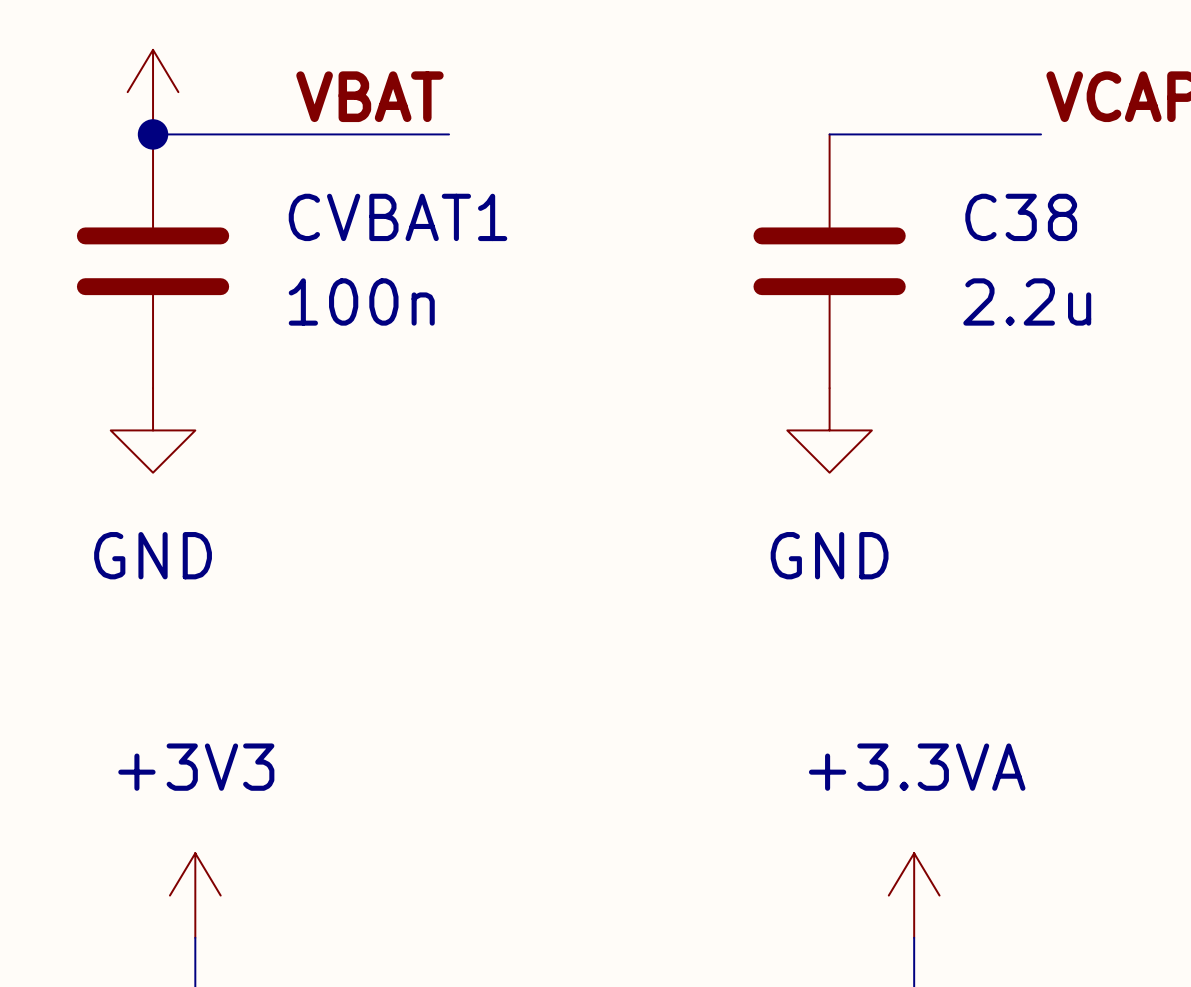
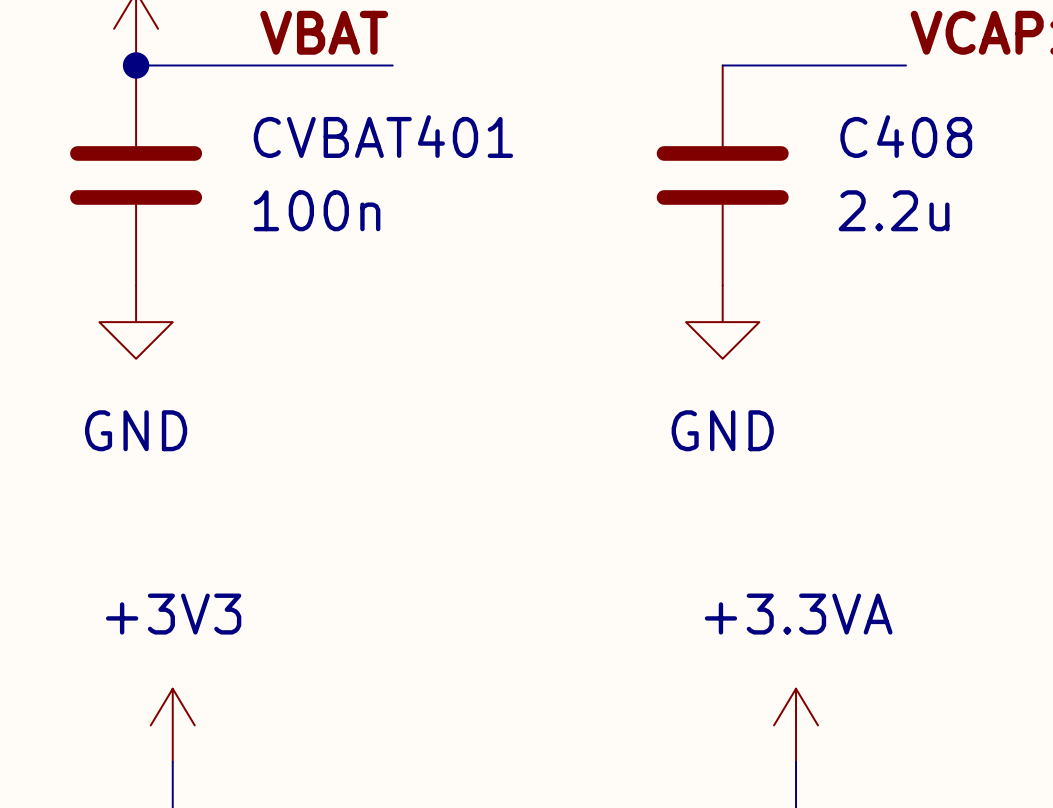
CVBAT1 name: CVBAT1 (398, 217) -> CVBAT401 (383, 136)
C38 name: C38 (1021, 217) -> C408 (906, 136)

